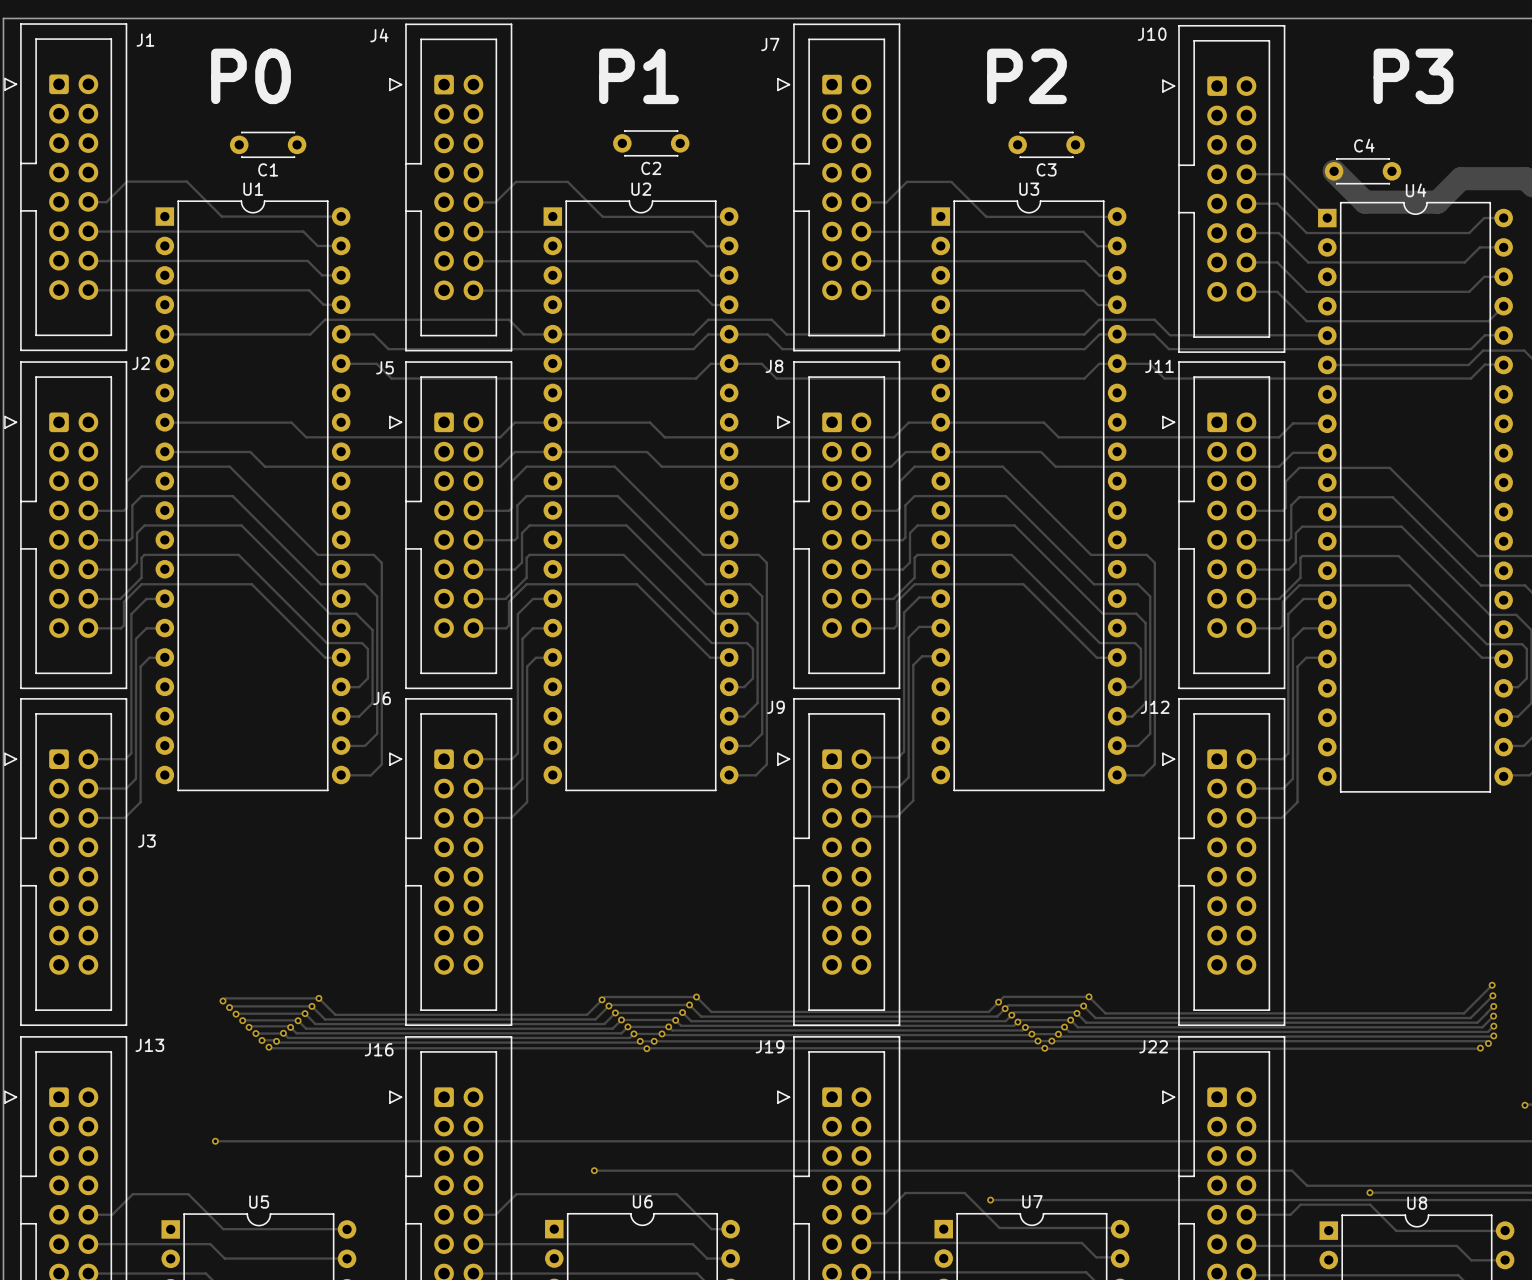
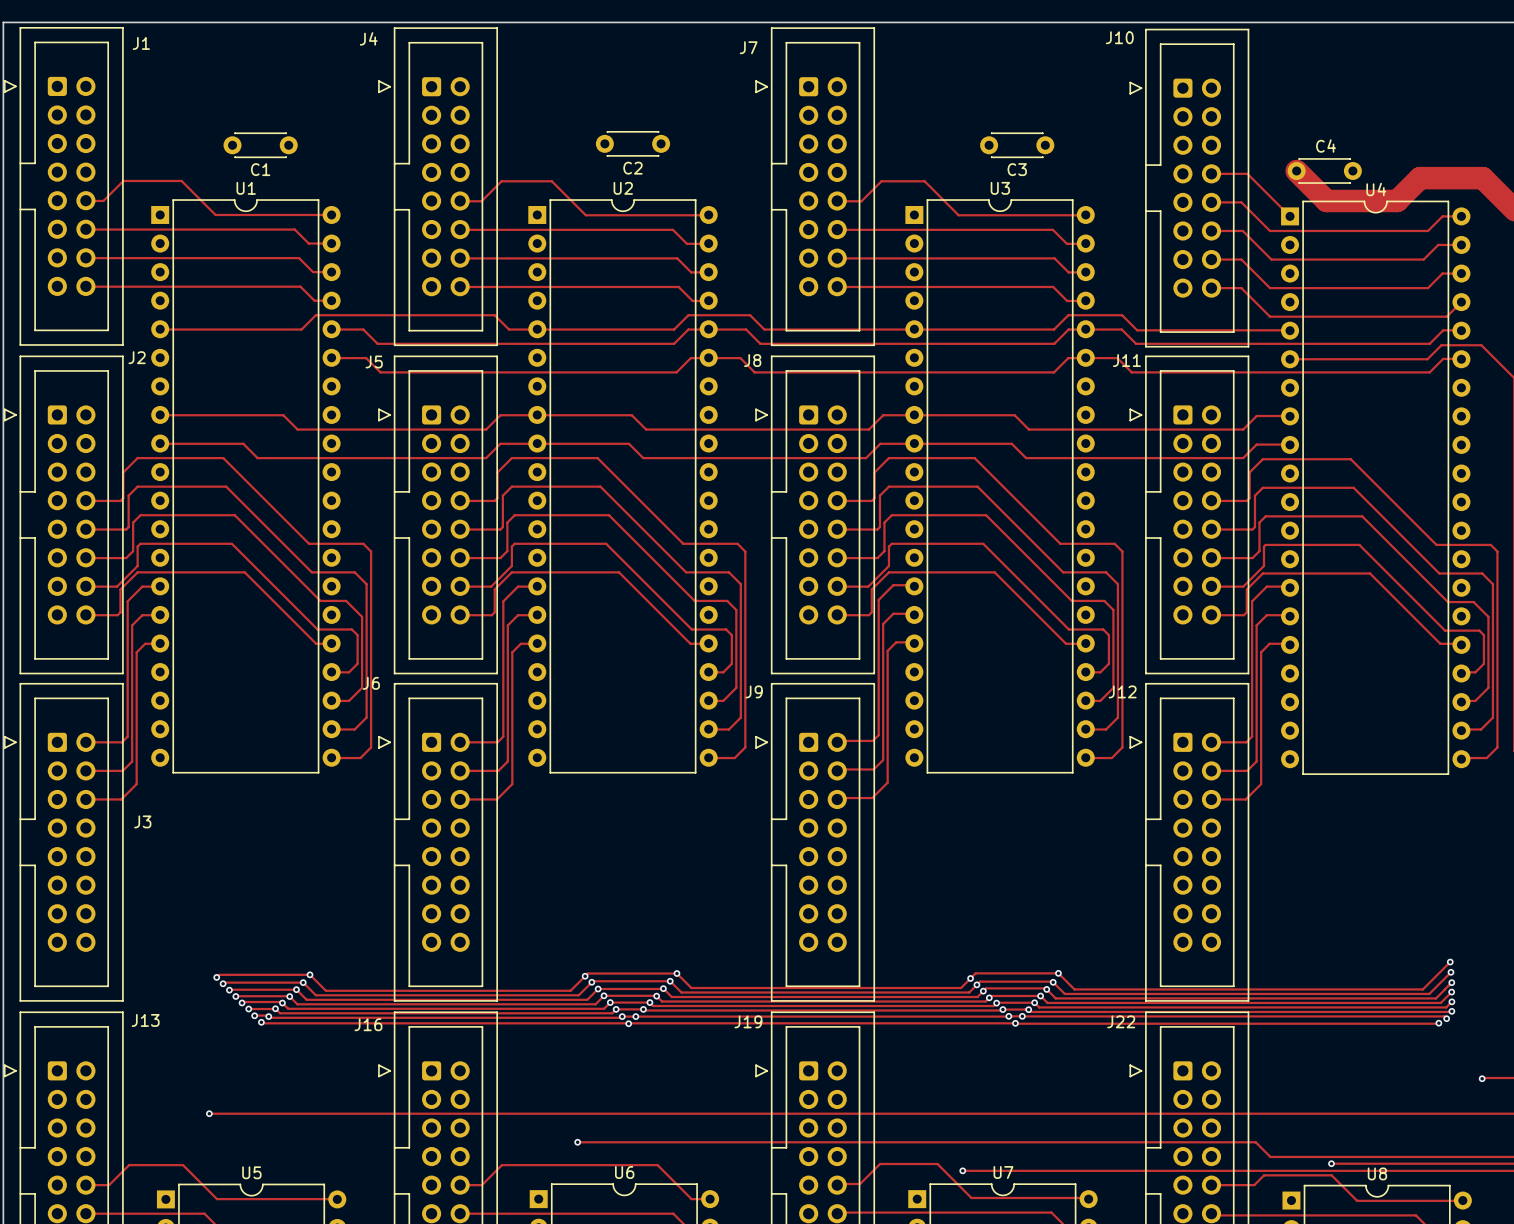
text: P0 (251, 76) -> none
text: P1 (638, 76) -> none
text: P2 (1026, 76) -> none
text: P3 (1413, 76) -> none

